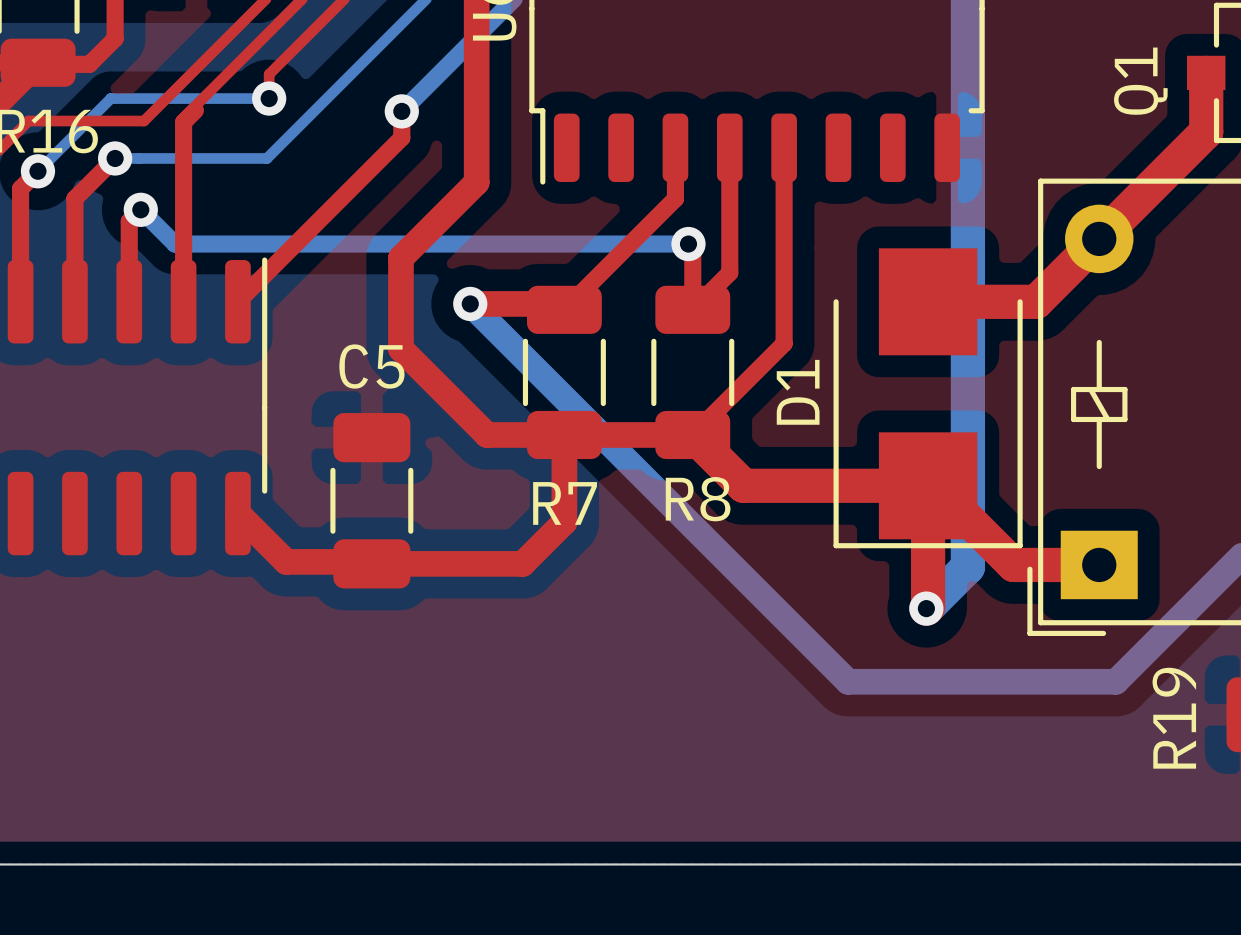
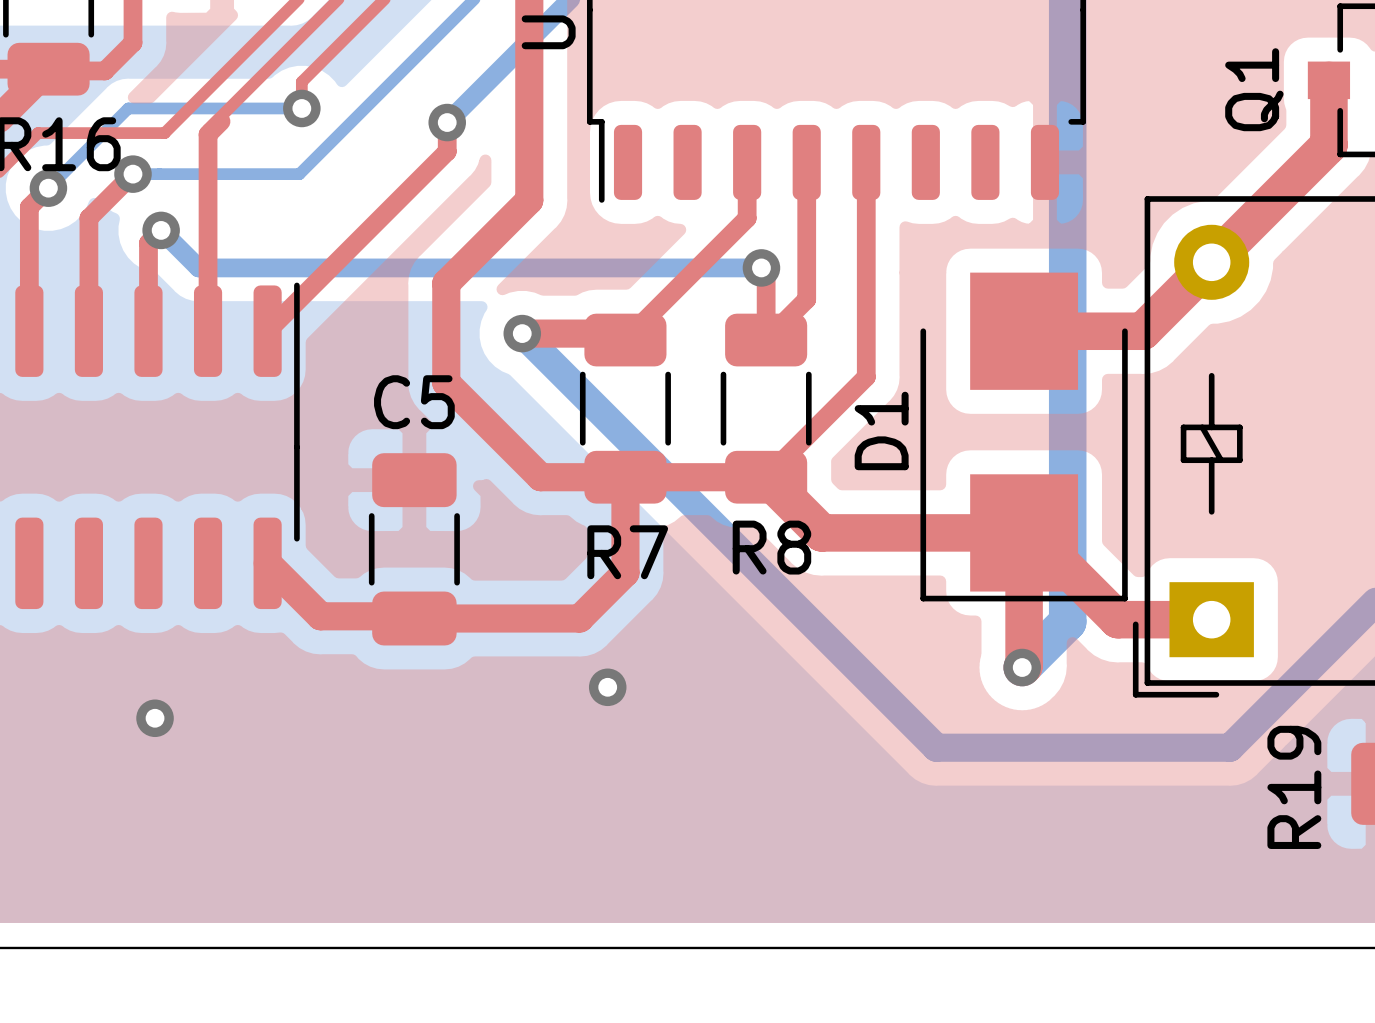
via: none -> (607, 687)
via: none -> (155, 718)

